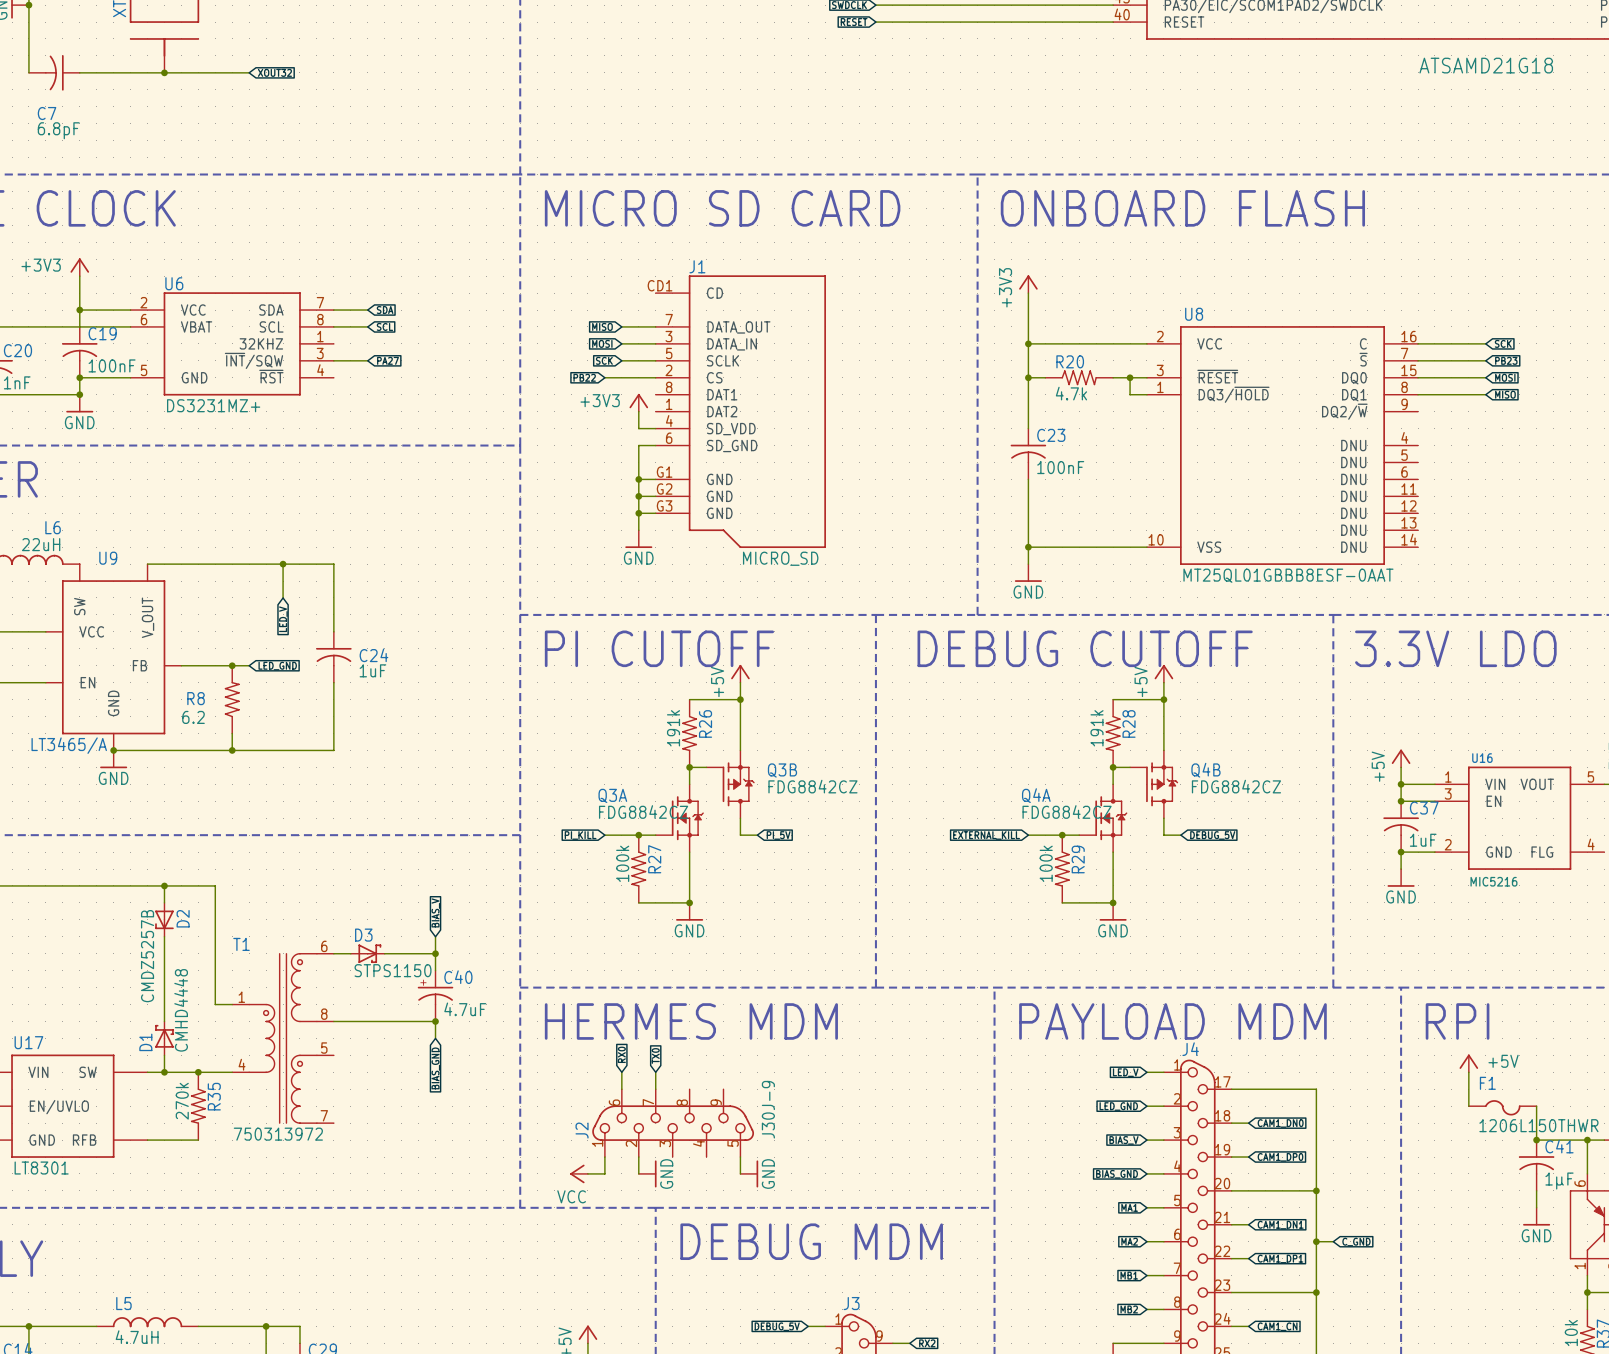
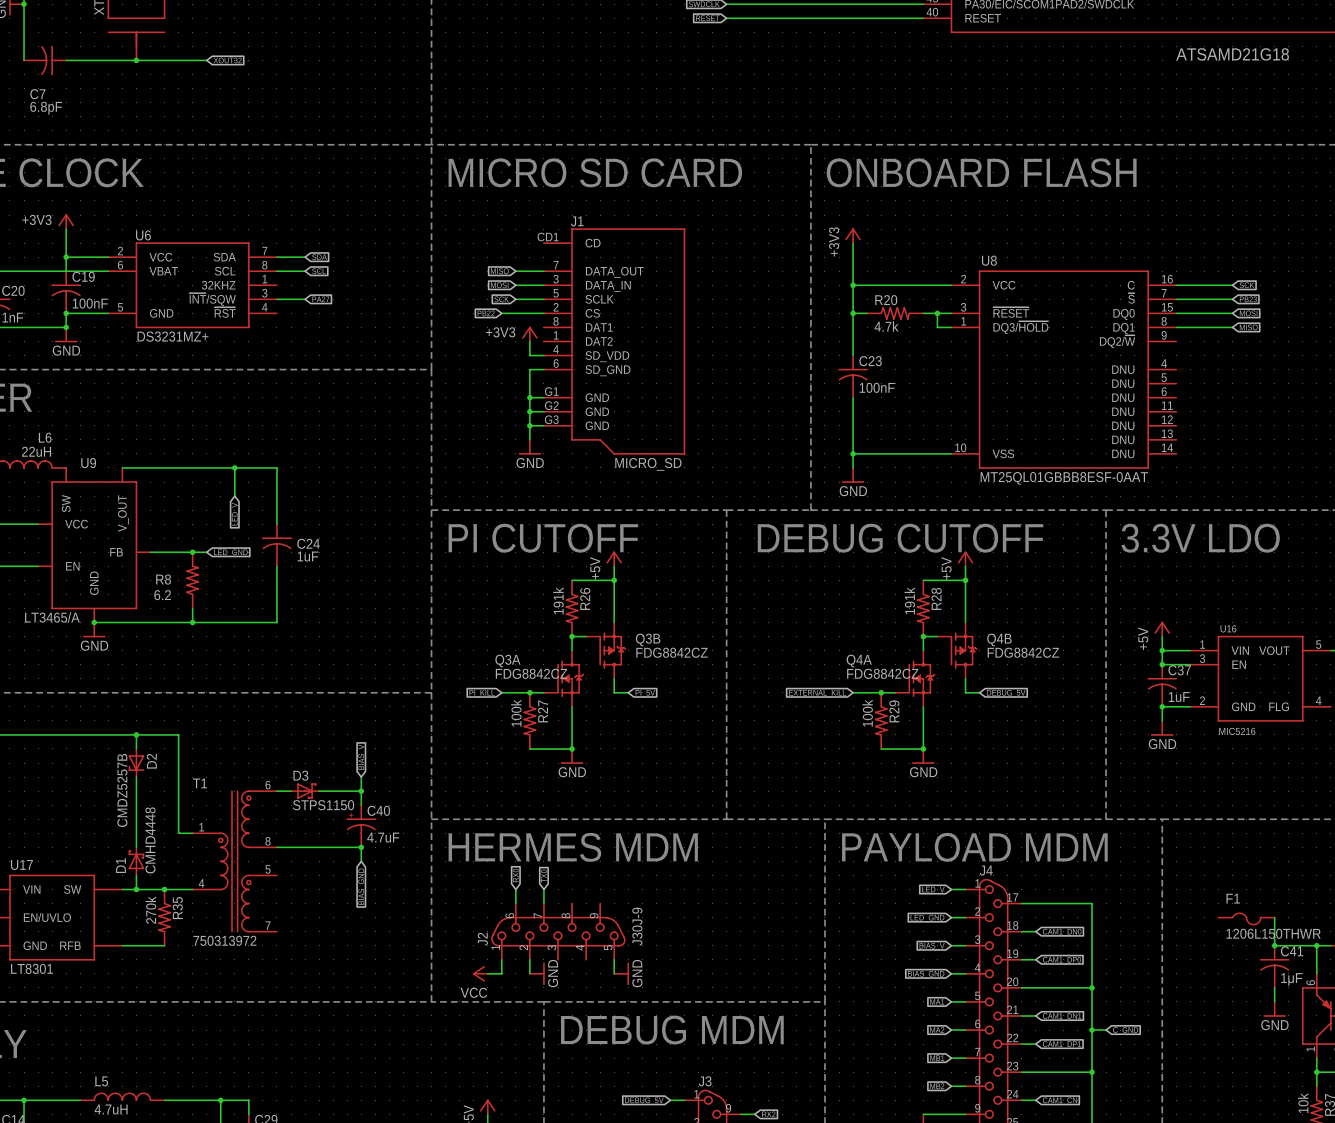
text: RPI (1457, 1021) -> none
power symbol: +5V (1468, 1063) -> none
wire: (1468, 1072) (1468, 1106) -> none

